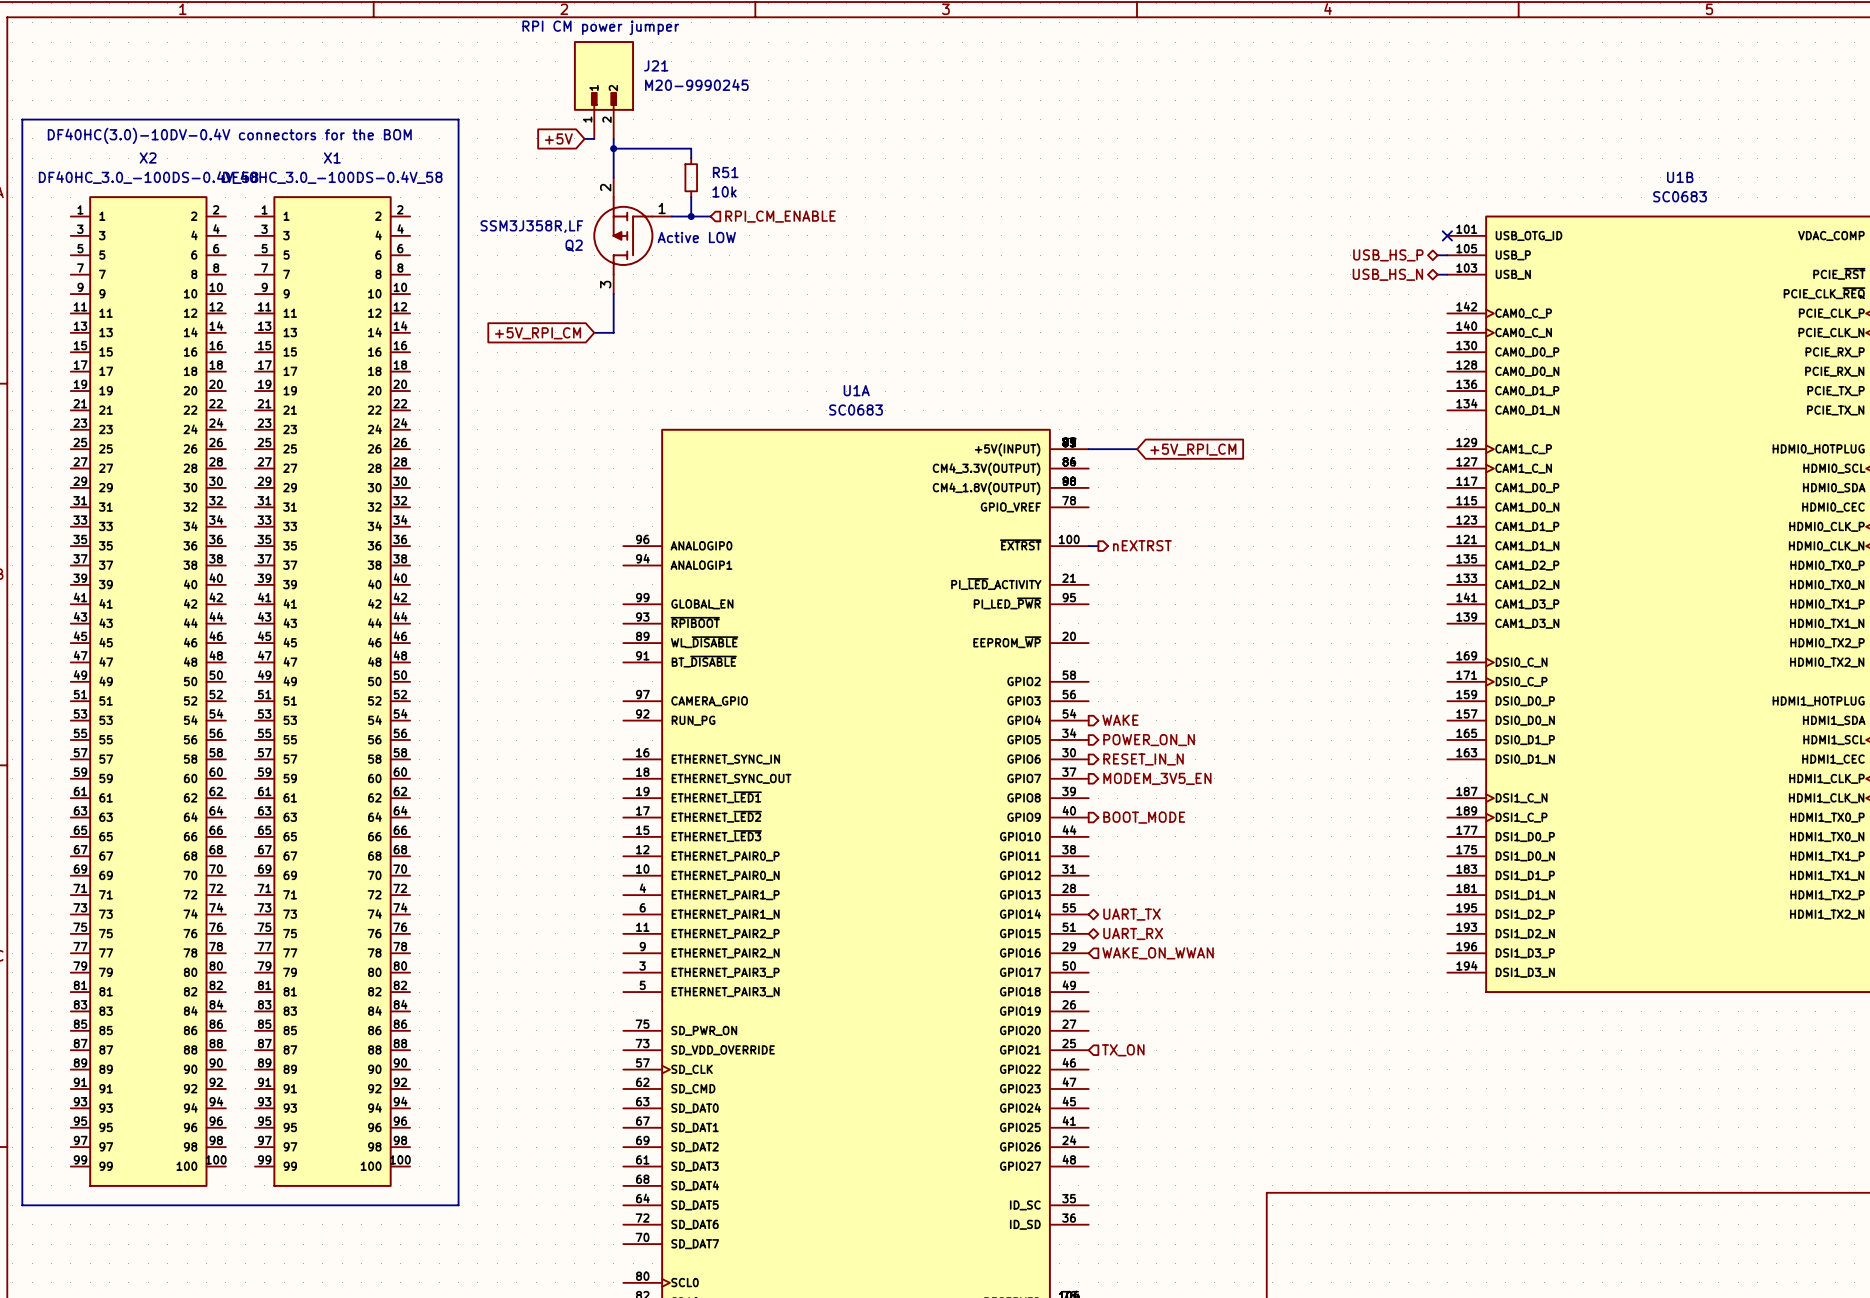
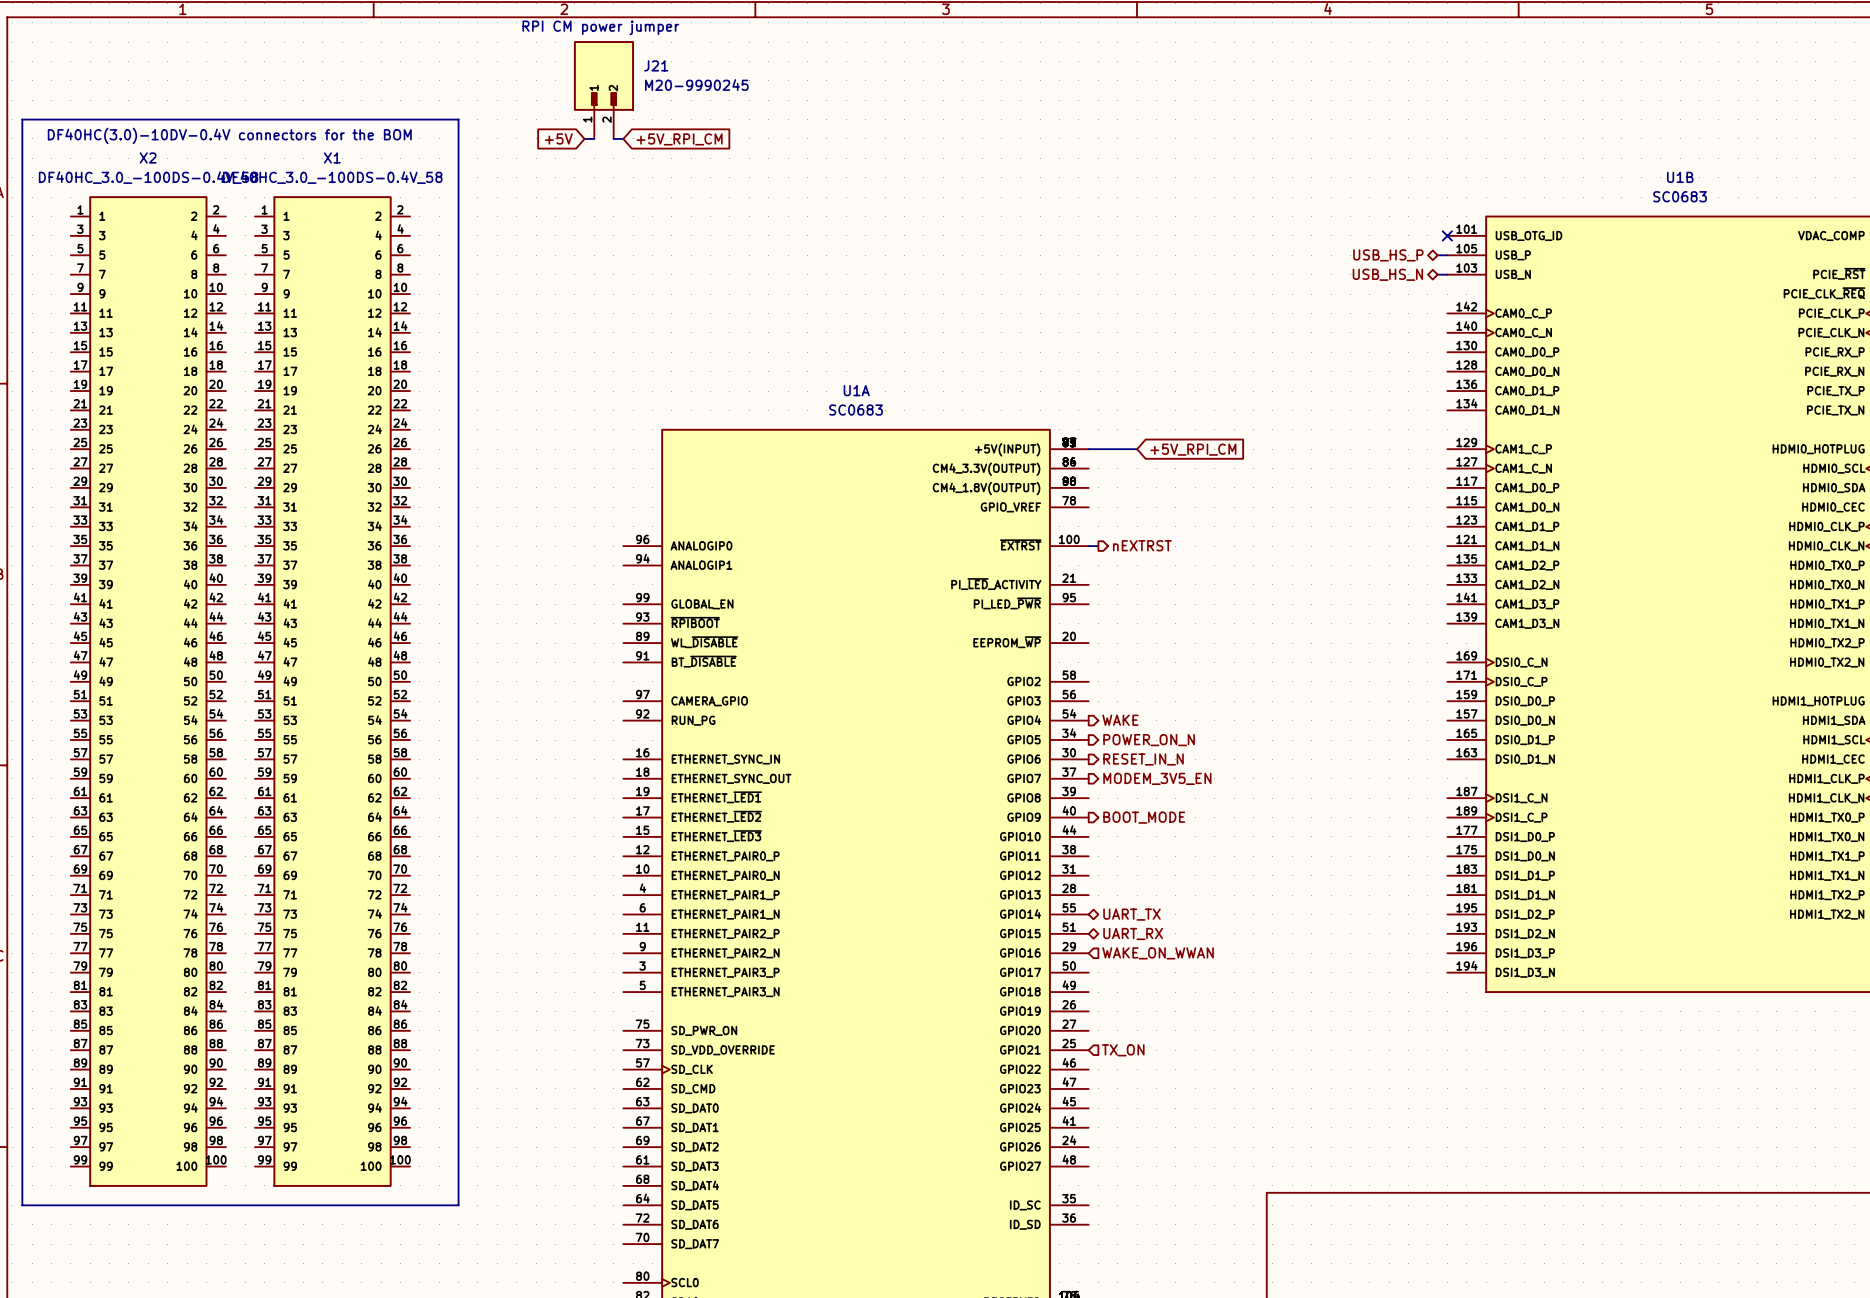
wire: (613, 138) (613, 177) -> (613, 138) (623, 138)
global label: none -> +5V_RPI_CM (679, 139)
wire: (613, 148) (691, 148) (691, 158) -> none
junction: (613, 148) -> none
R51: 10k (691, 177) -> none
wire: (691, 197) (691, 216) -> none
wire: (671, 216) (710, 216) -> none
junction: (691, 216) -> none
hierarchical label: RPI_CM_ENABLE (780, 216) -> none
Q2: SSM3J358R,LF (632, 235) -> none
text: Active LOW (696, 237) -> none
wire: (613, 294) (613, 332) (594, 332) -> none
global label: +5V_RPI_CM (538, 333) -> none

